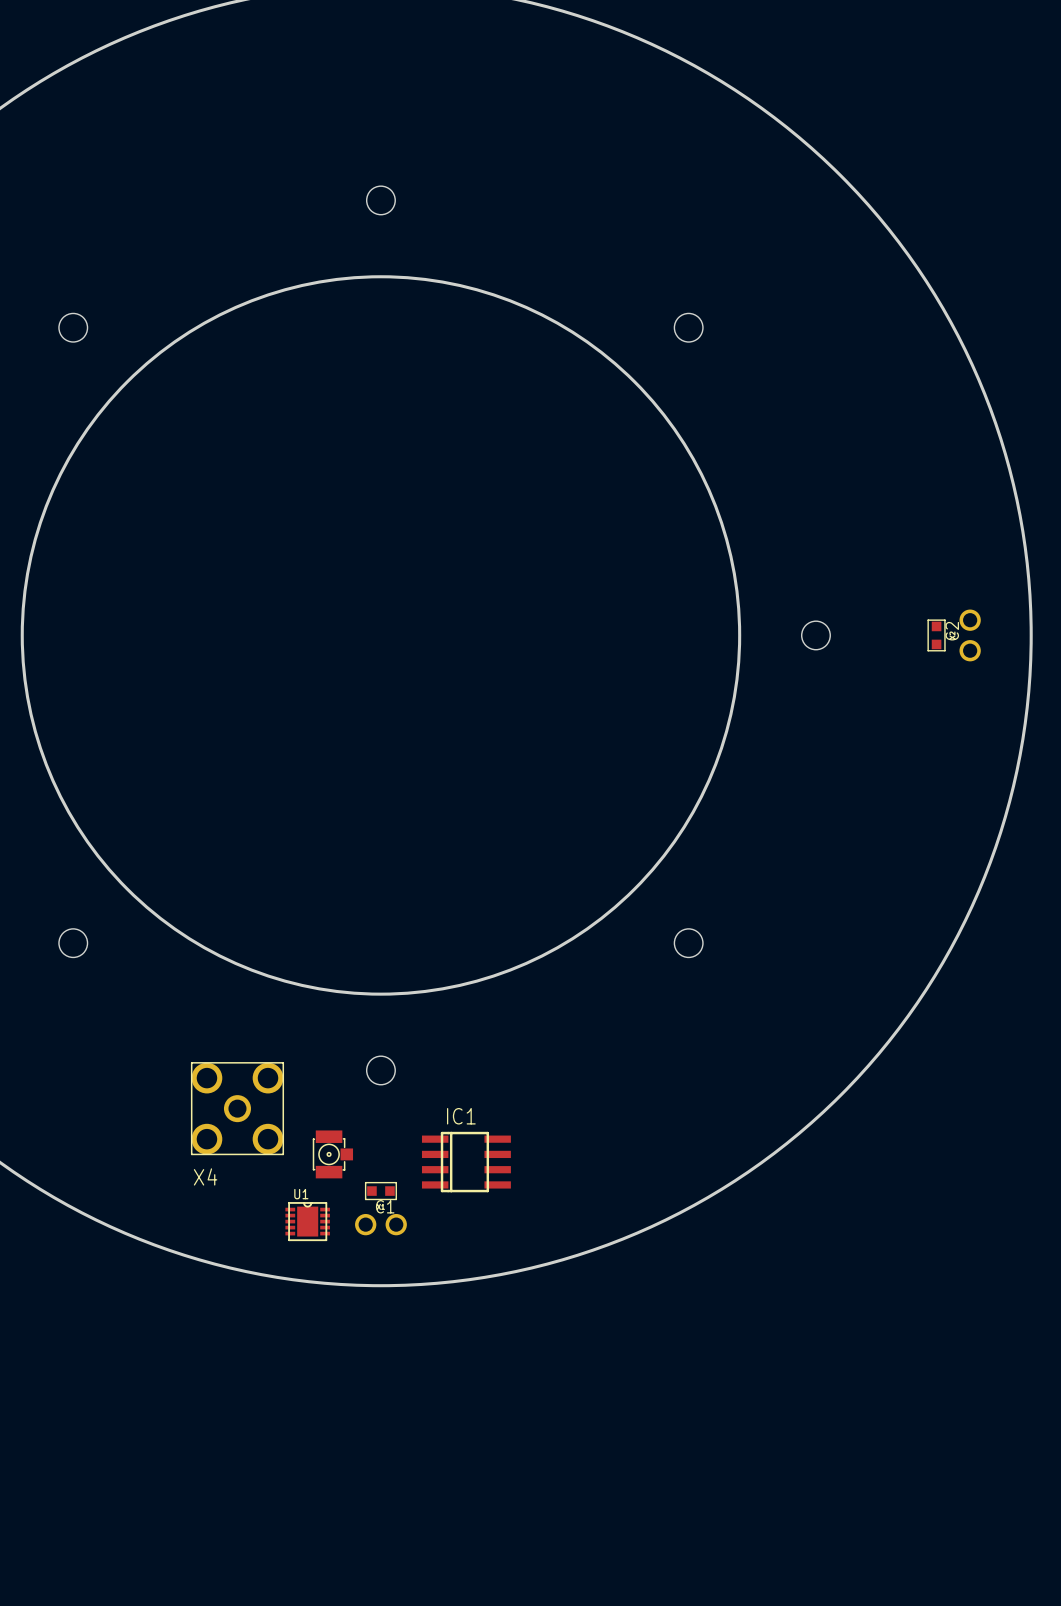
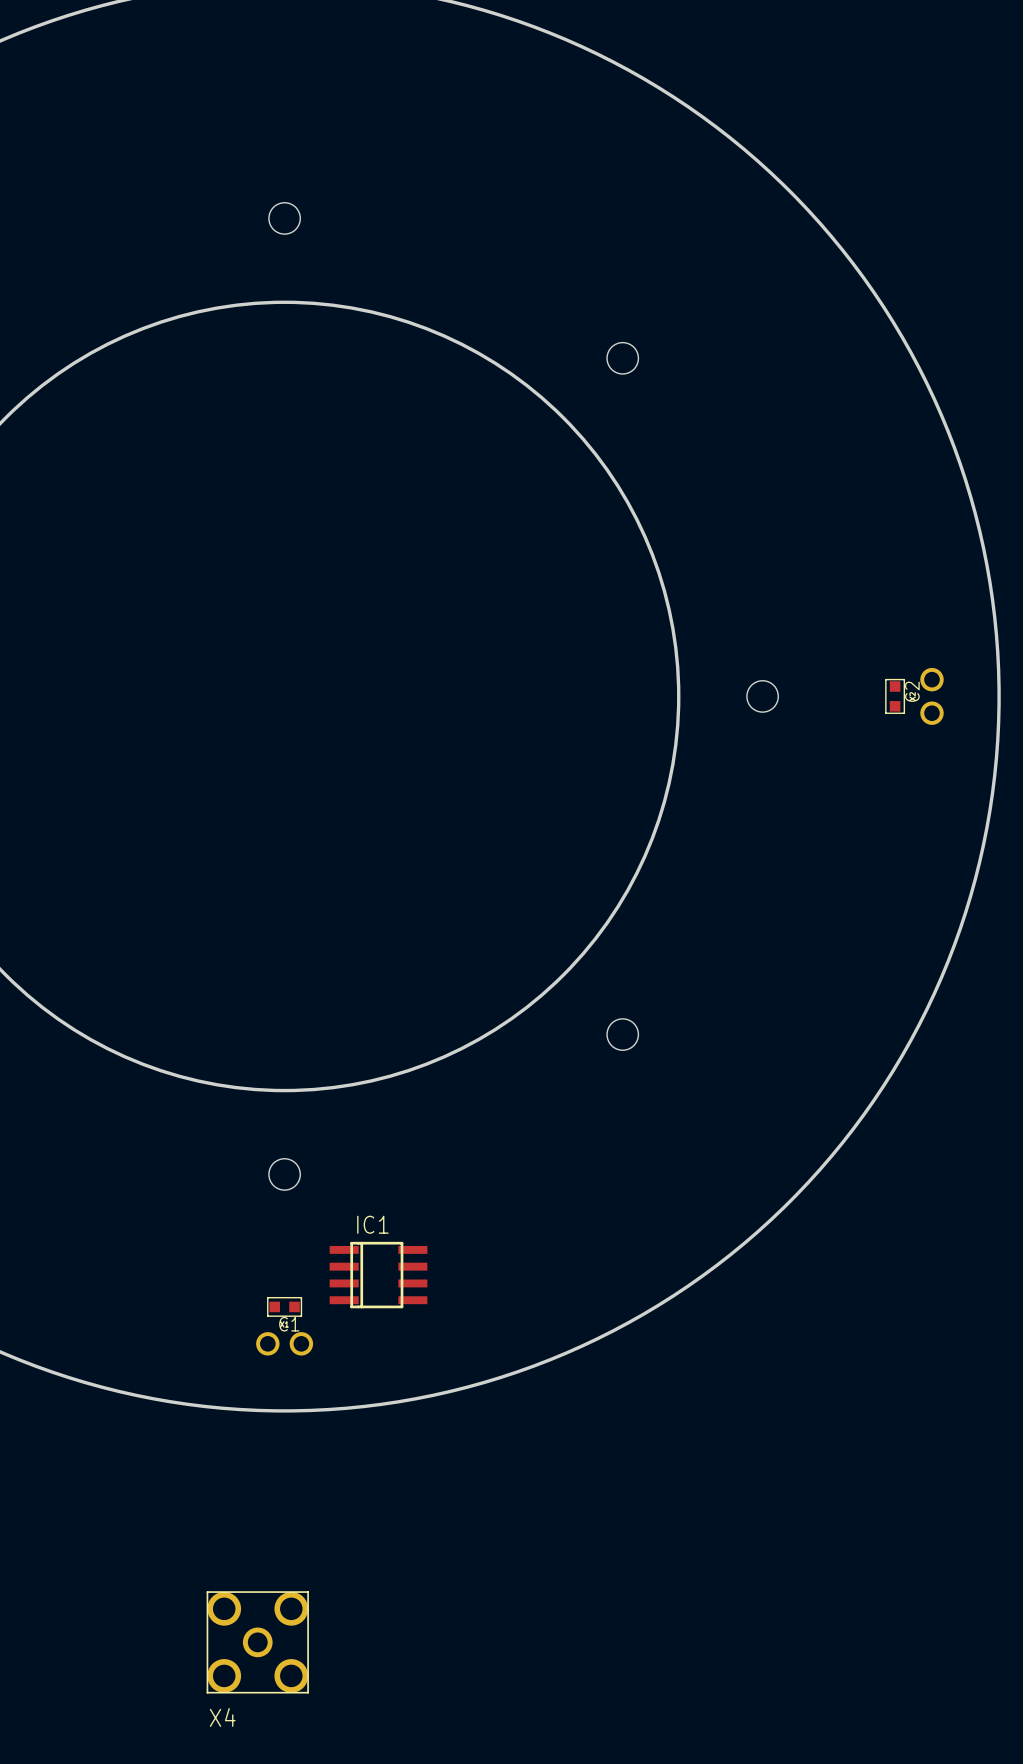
X4 position: (237, 1108) -> (257, 1642)
part: (332, 1154) -> none
U1: (307, 1221) -> none

